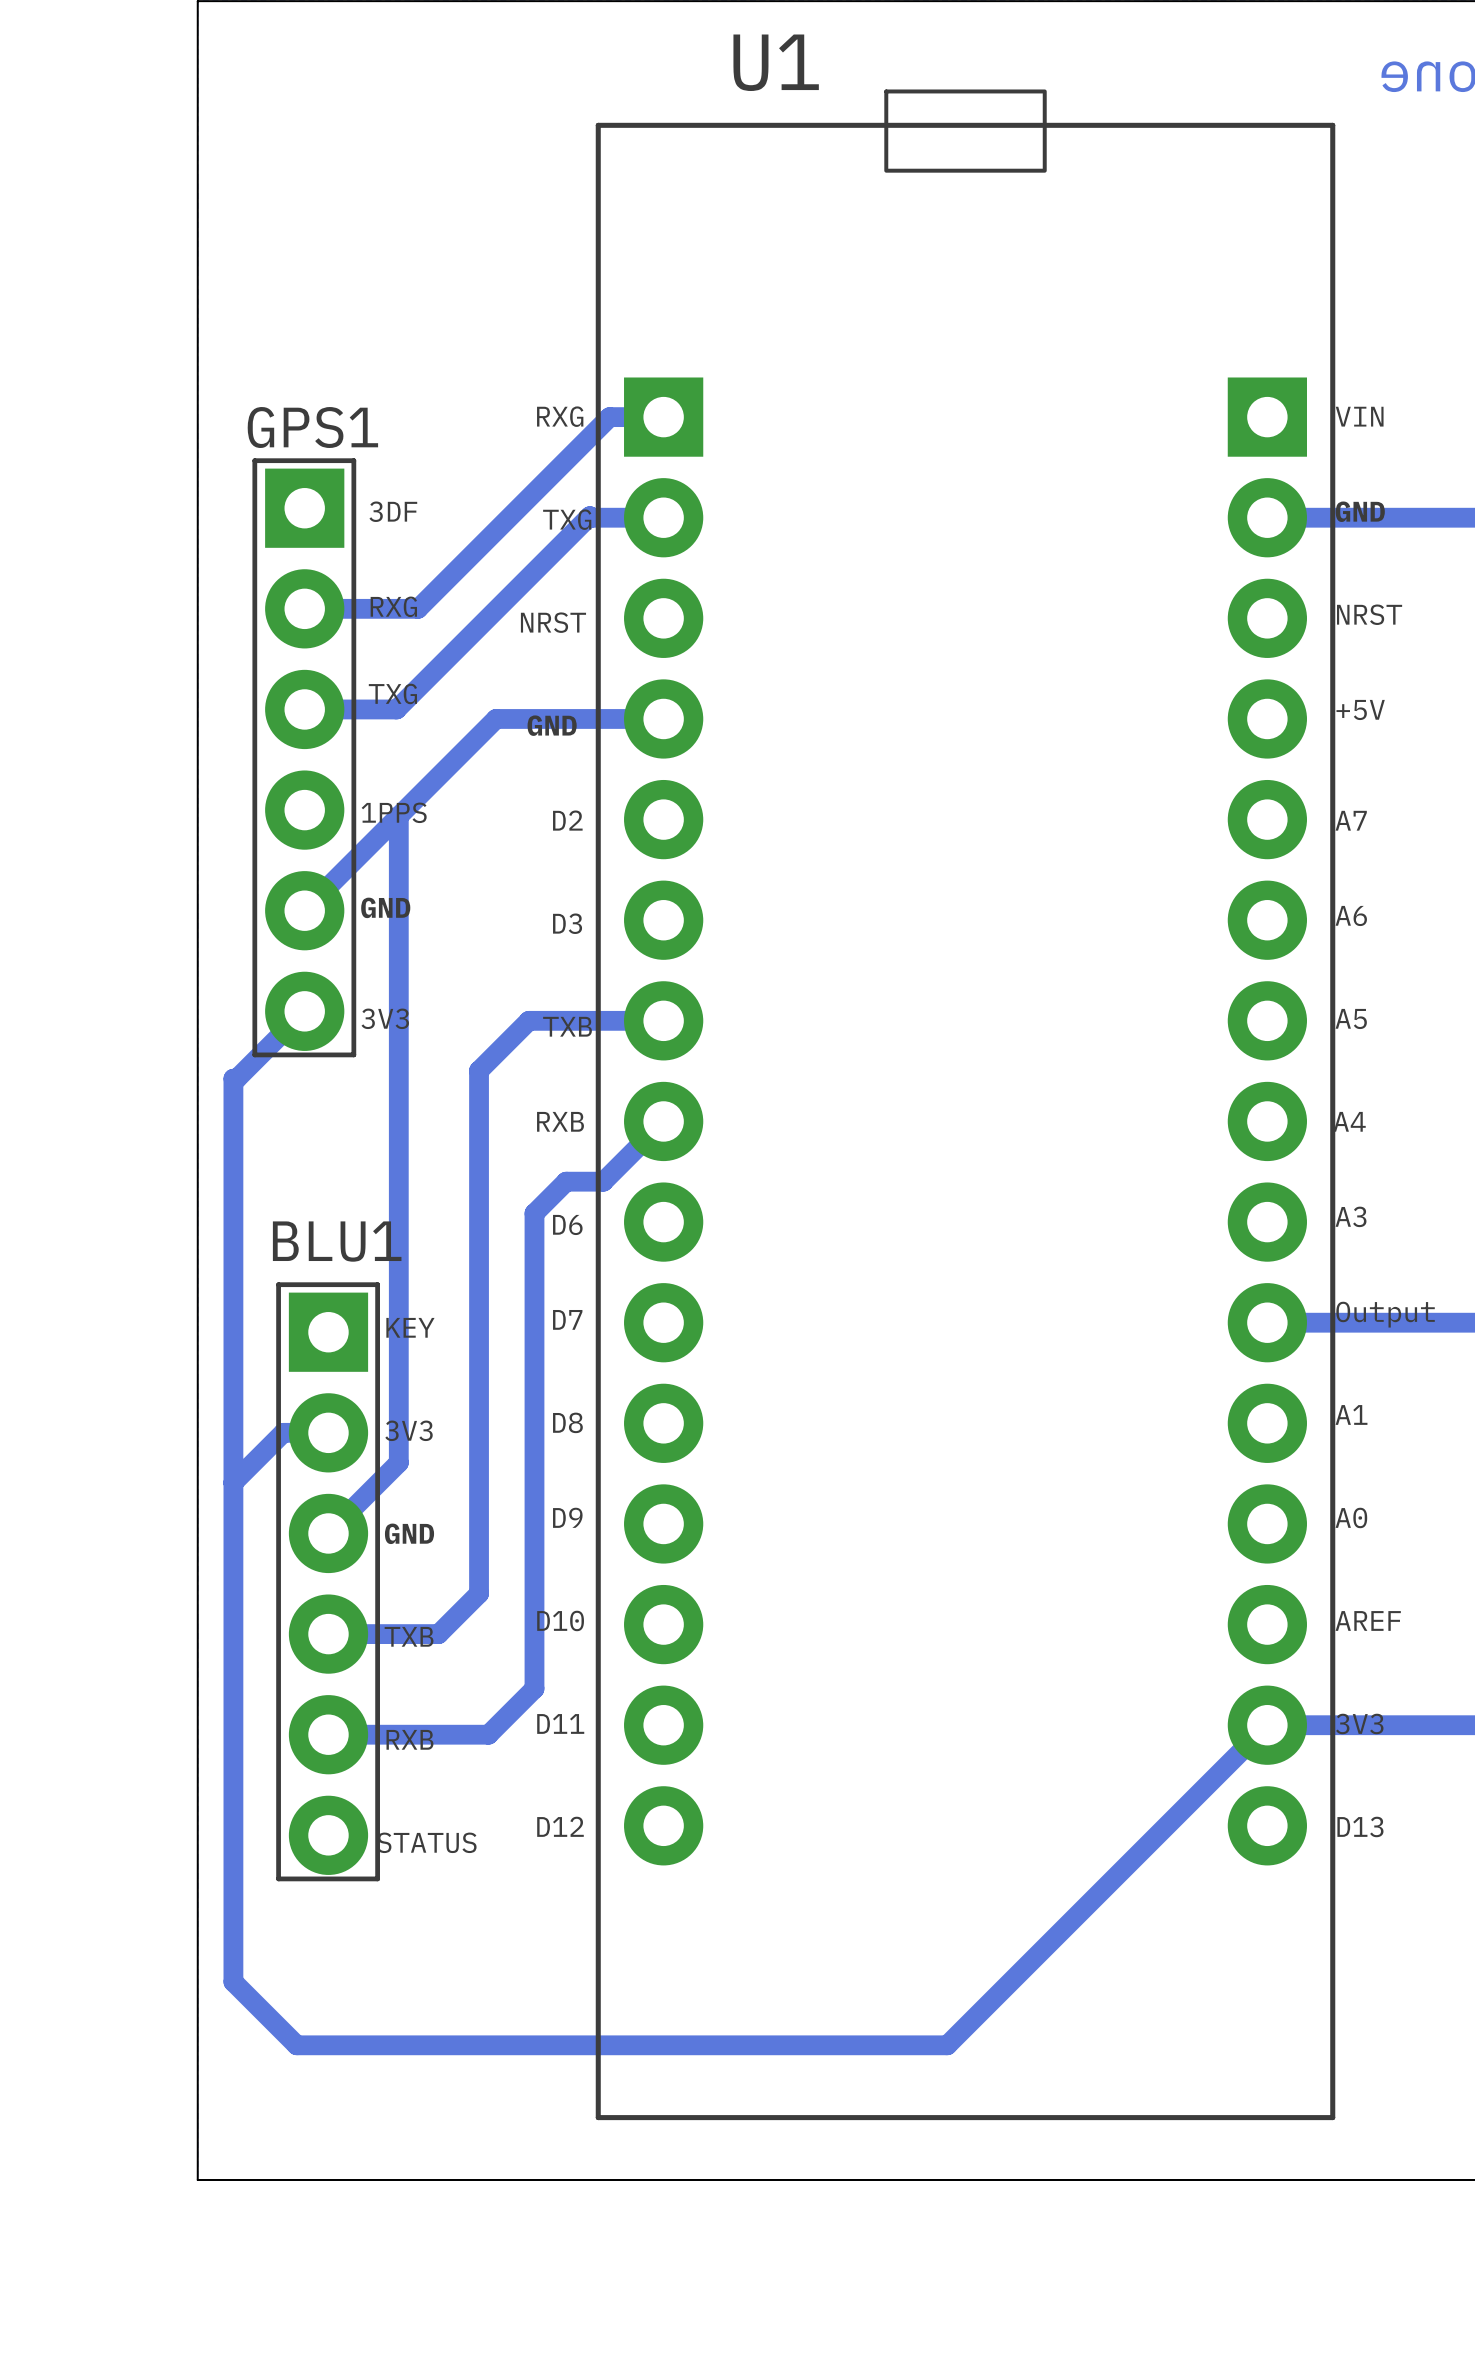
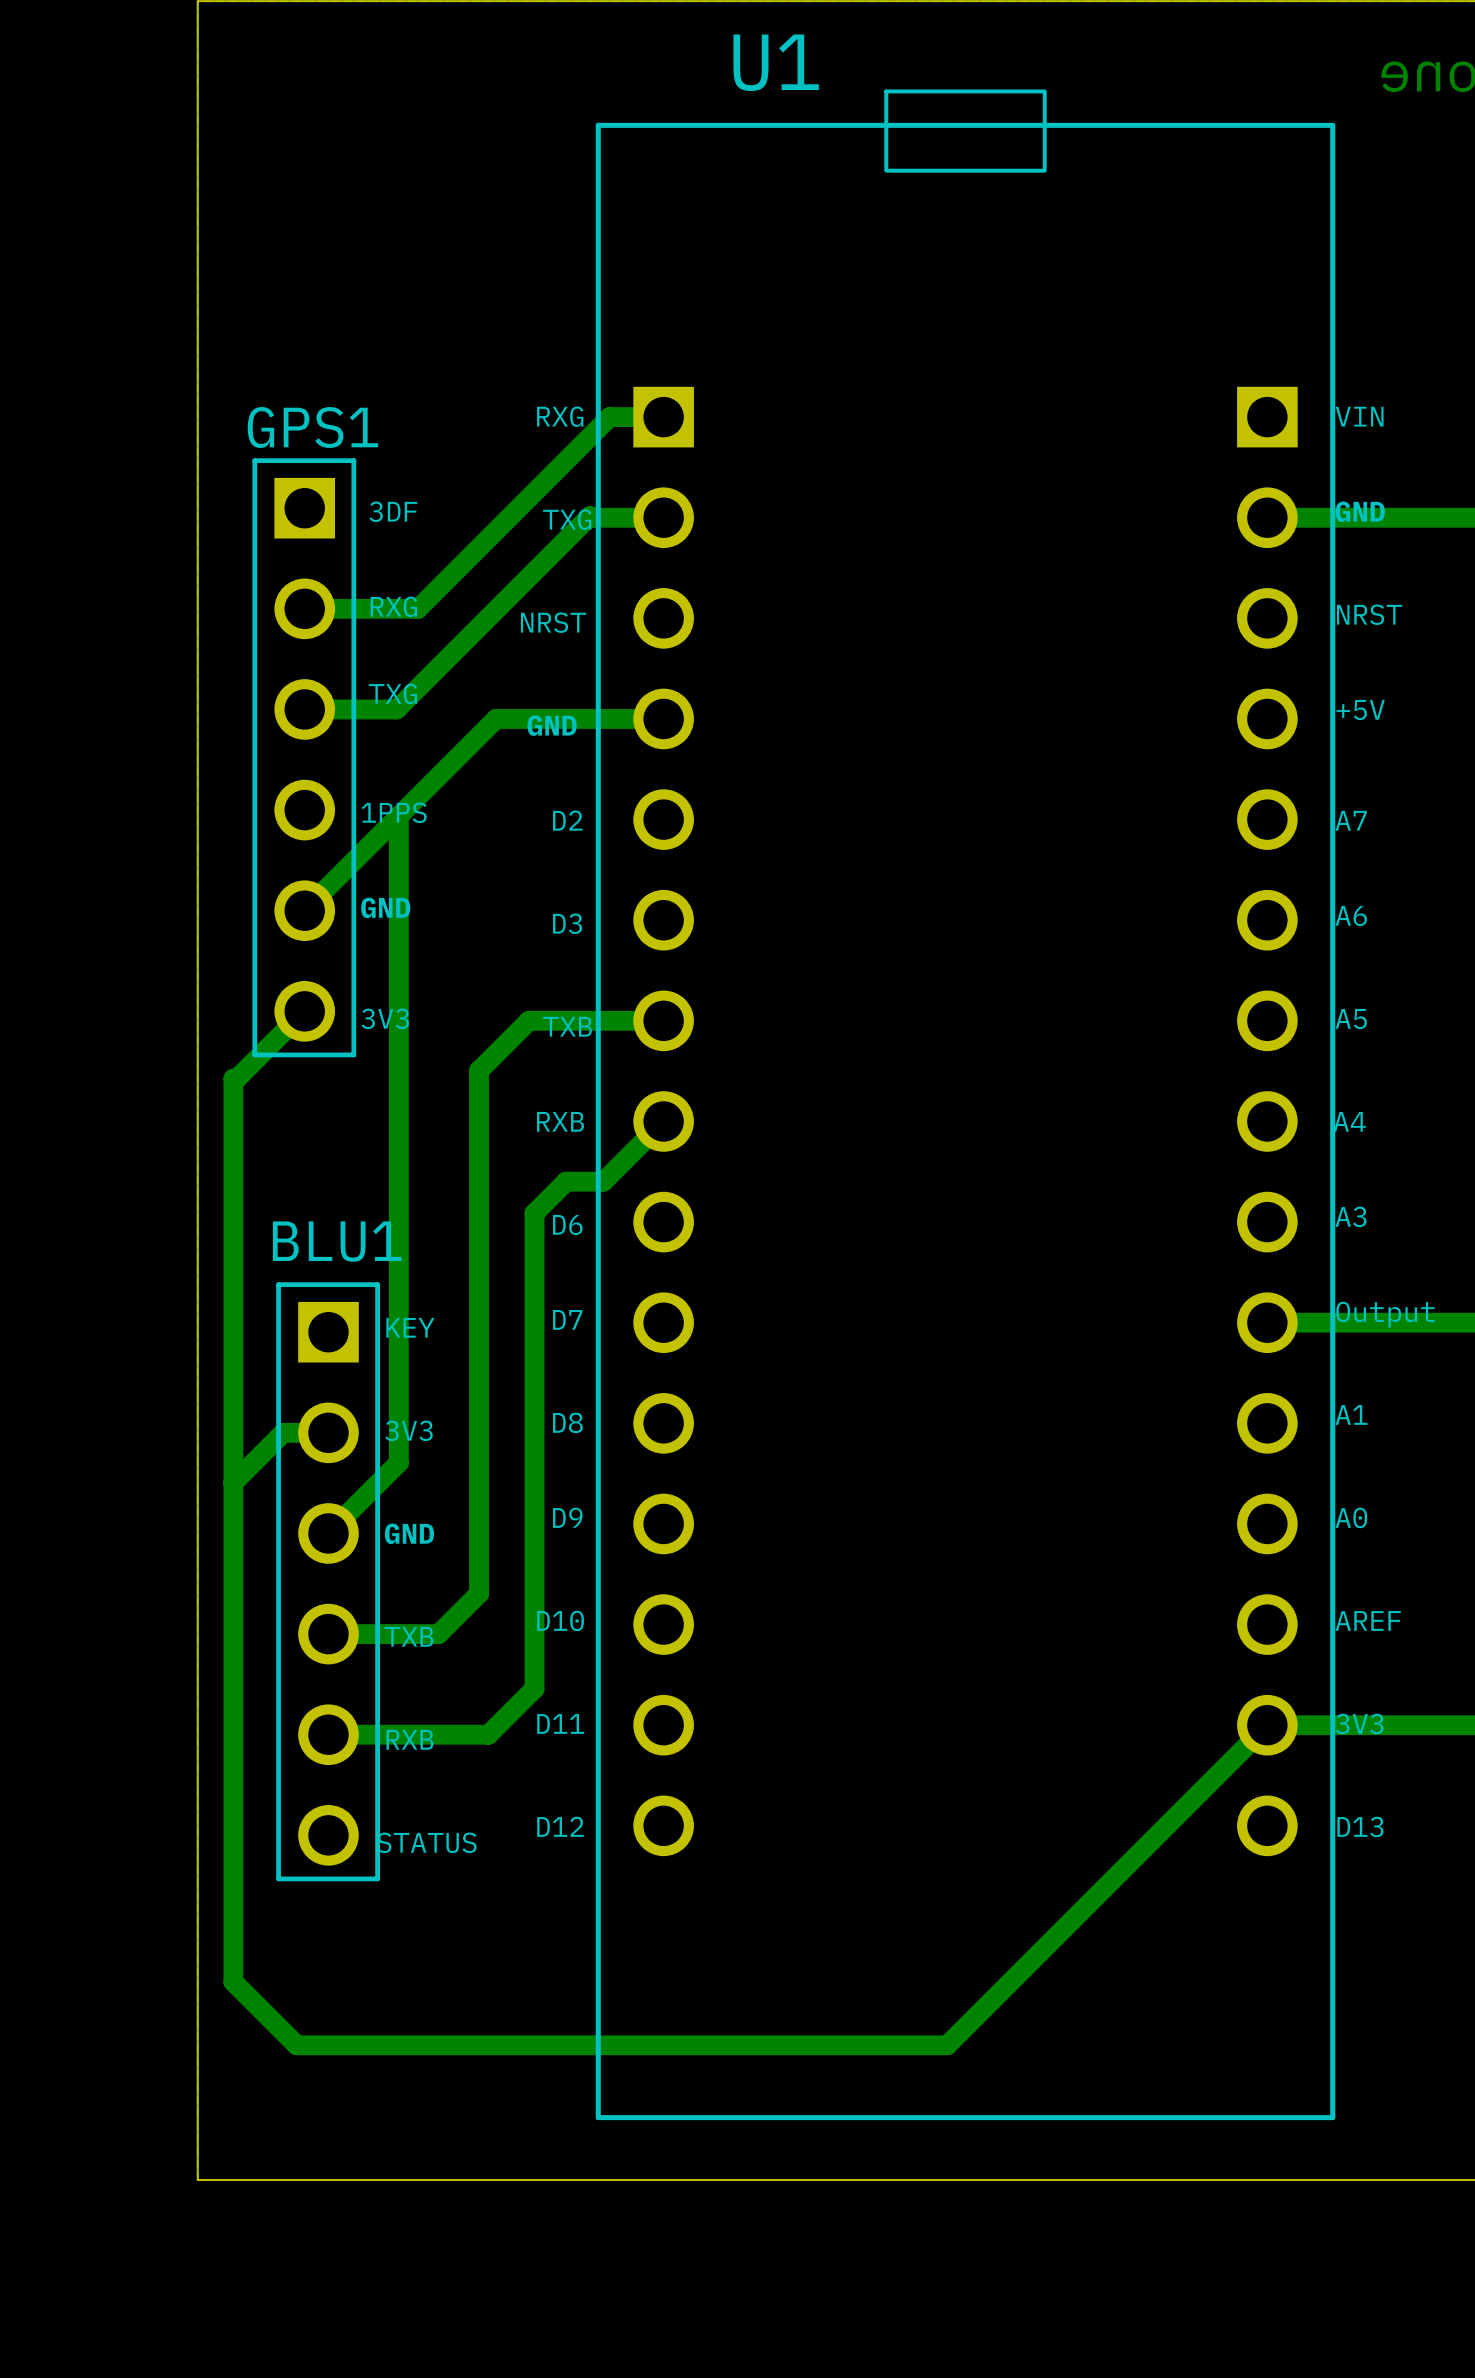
U1 footprint: [595, 89, 1336, 2121] -> [595, 89, 1336, 2121]
GPS1 footprint: [252, 458, 357, 1058] -> [252, 458, 357, 1058]
BLU1 footprint: [276, 1282, 380, 1882] -> [276, 1282, 380, 1882]

